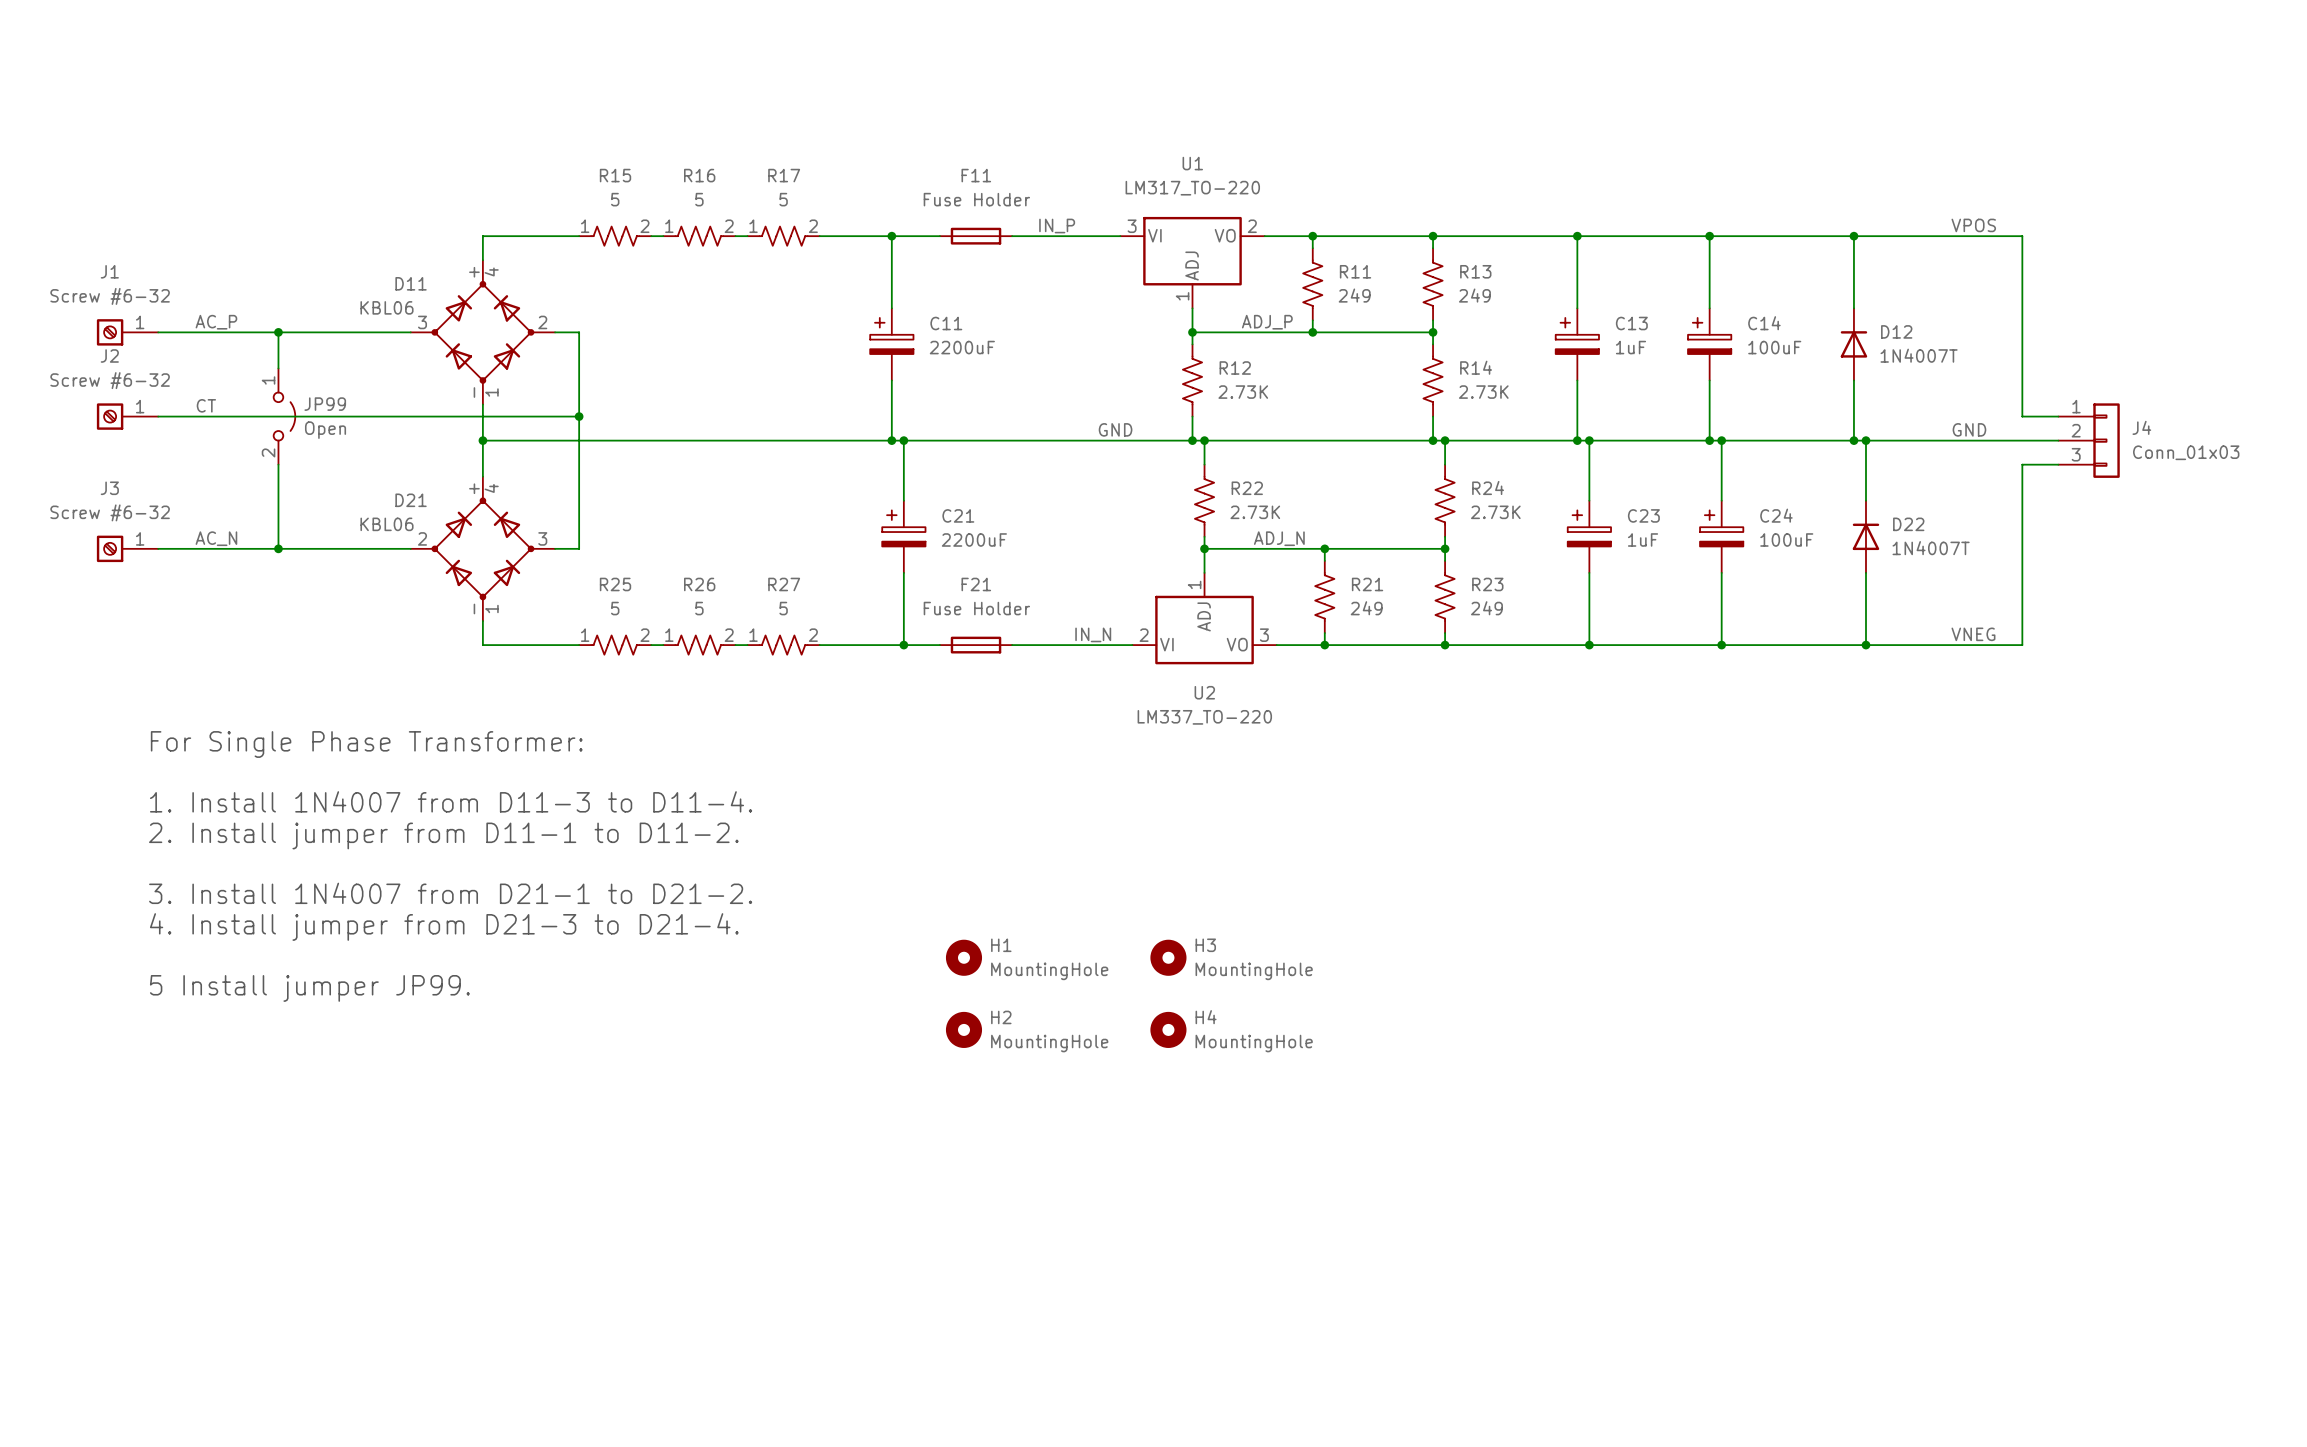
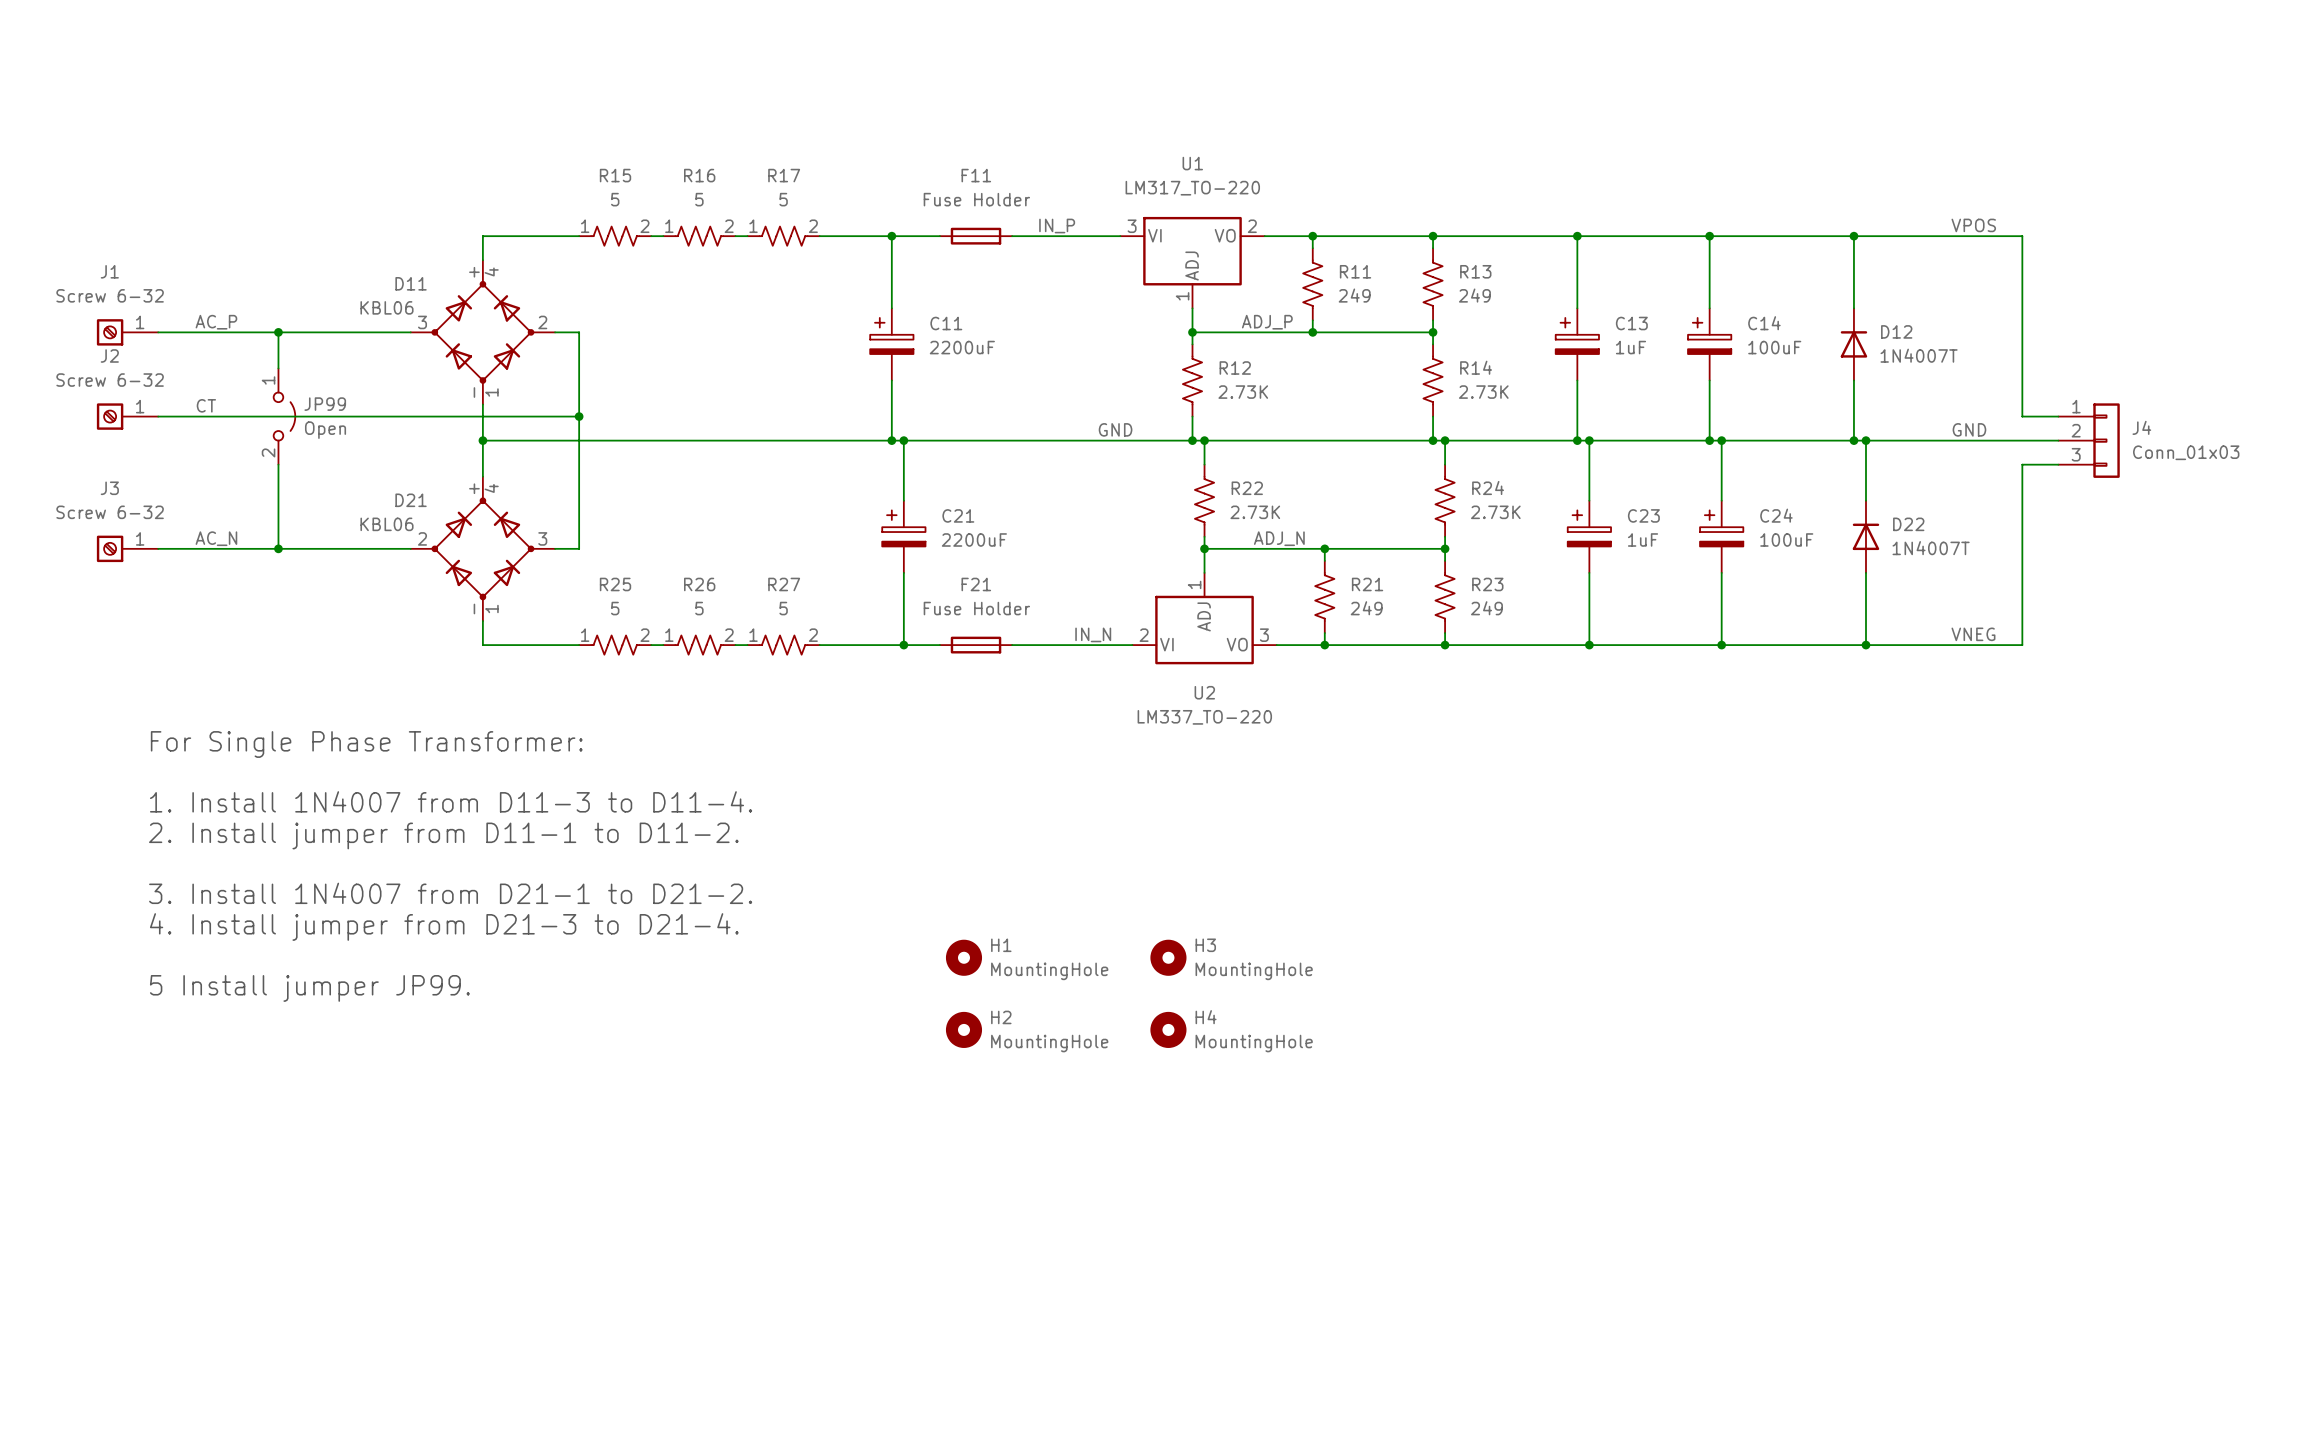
J1 value: Screw #6-32 (110, 296) -> Screw 6-32 (110, 295)
J2 value: Screw #6-32 (110, 380) -> Screw 6-32 (110, 380)
J3 value: Screw #6-32 (110, 512) -> Screw 6-32 (110, 512)

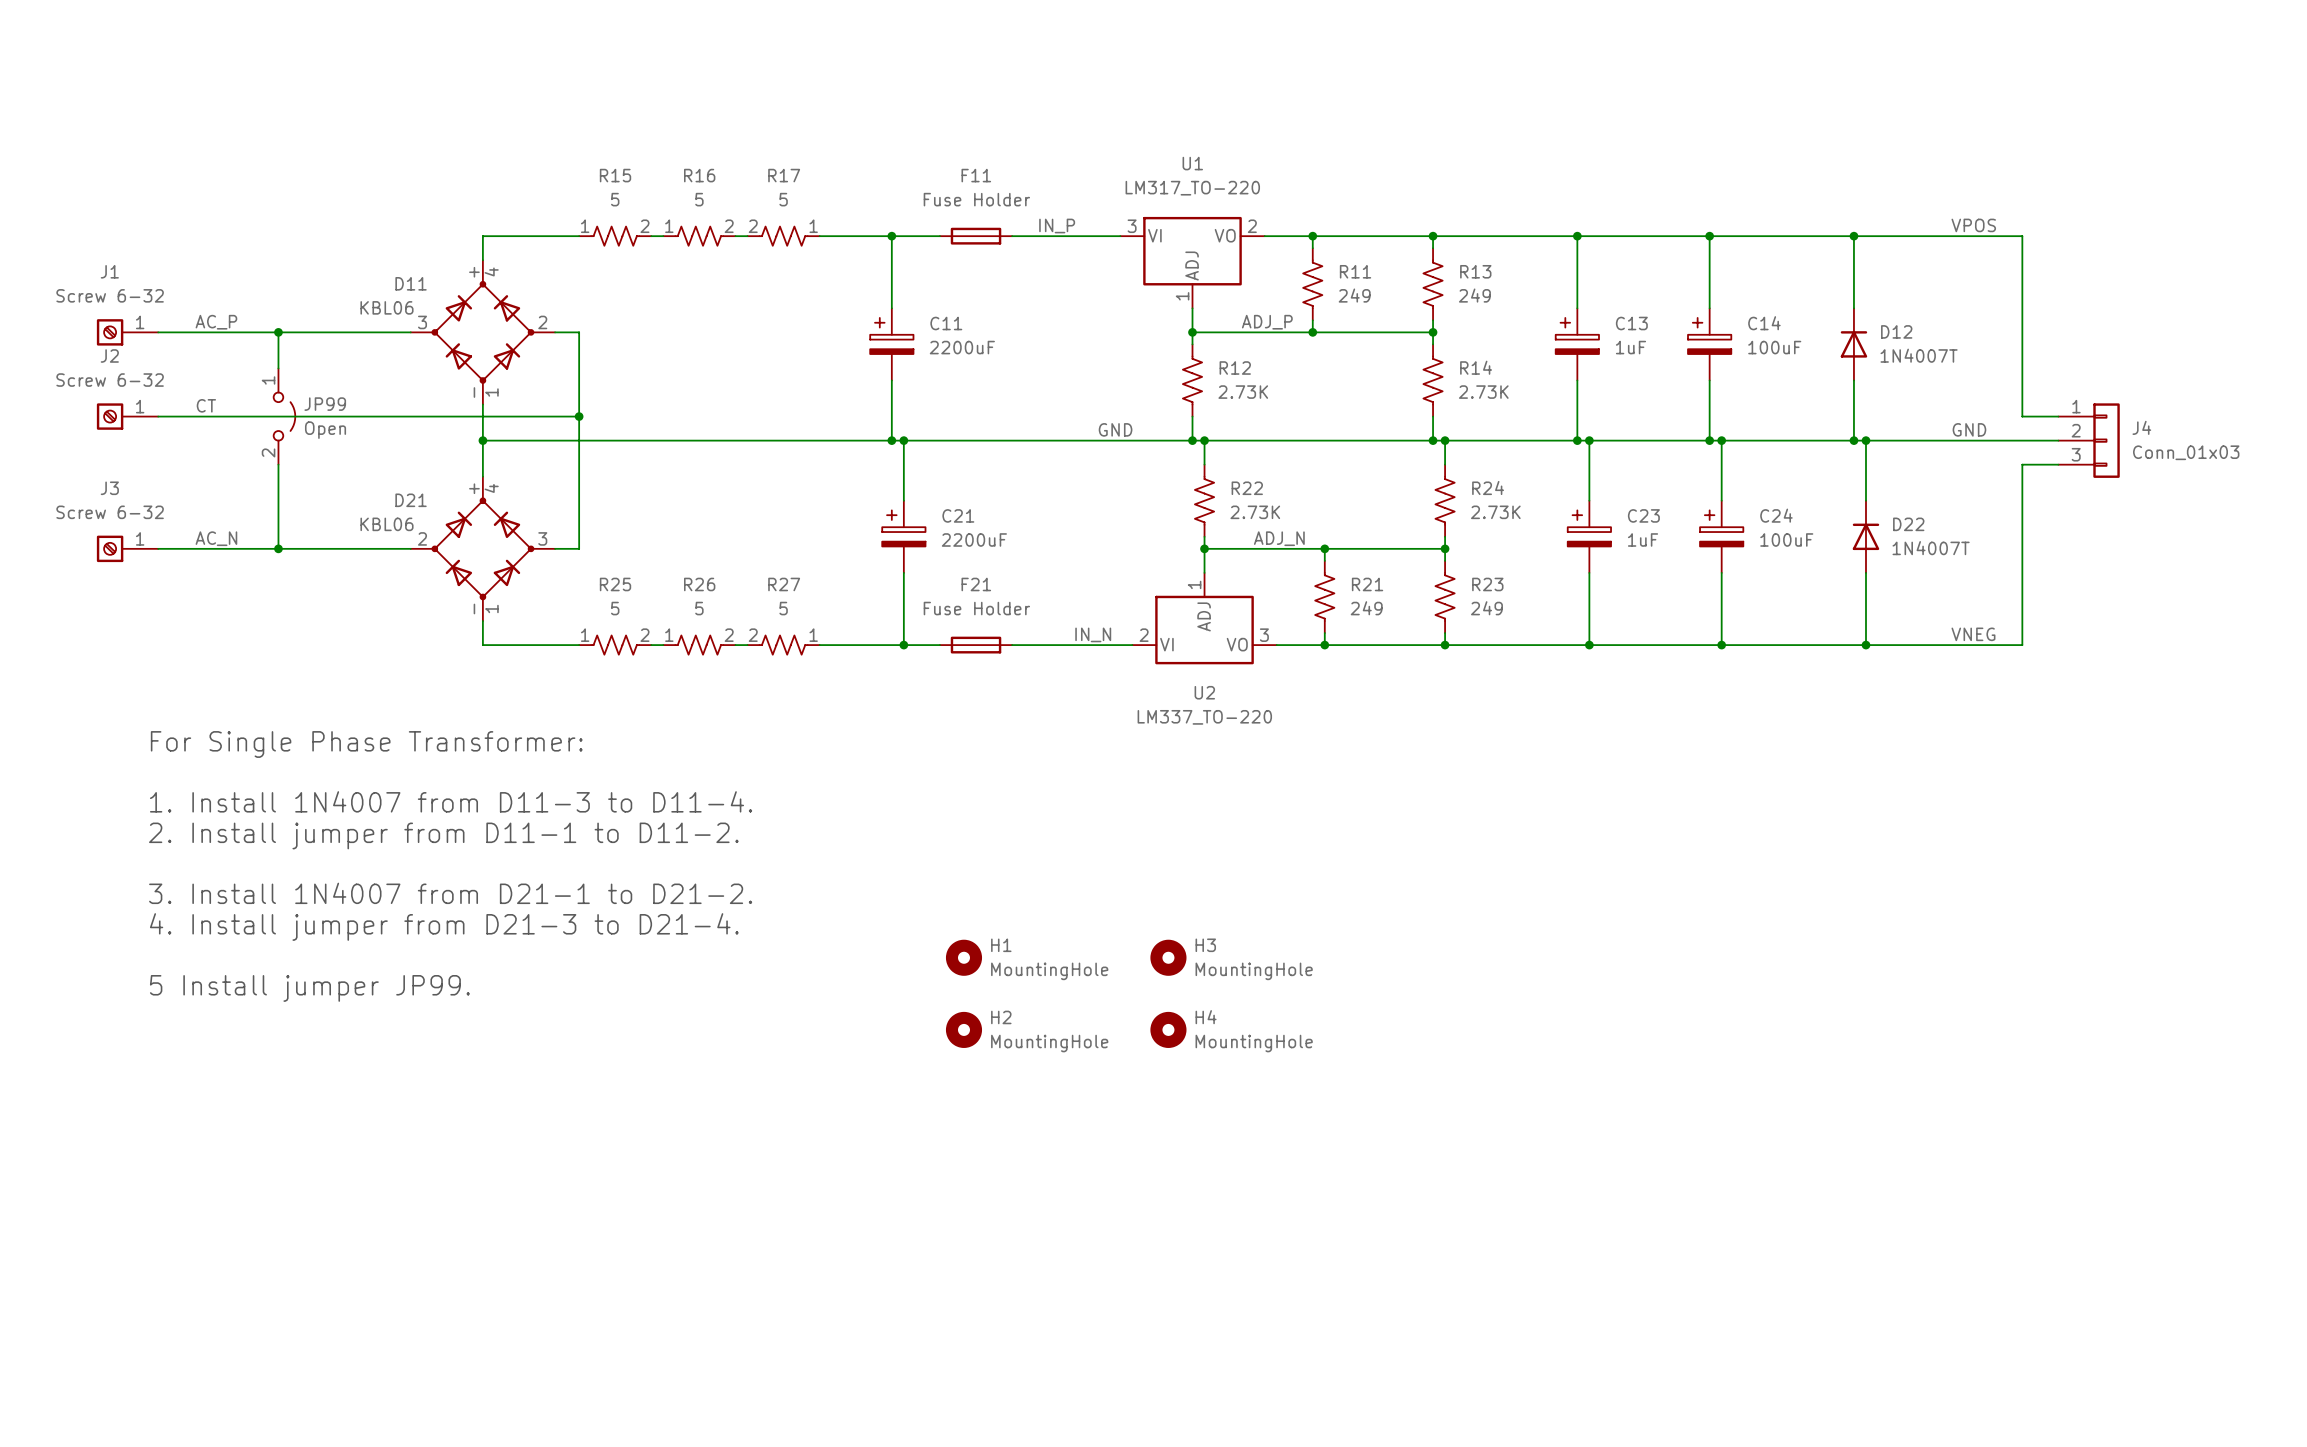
R17 rotation: 0° (783, 236) -> 180° (783, 236)
R27 rotation: 0° (783, 645) -> 180° (783, 645)

